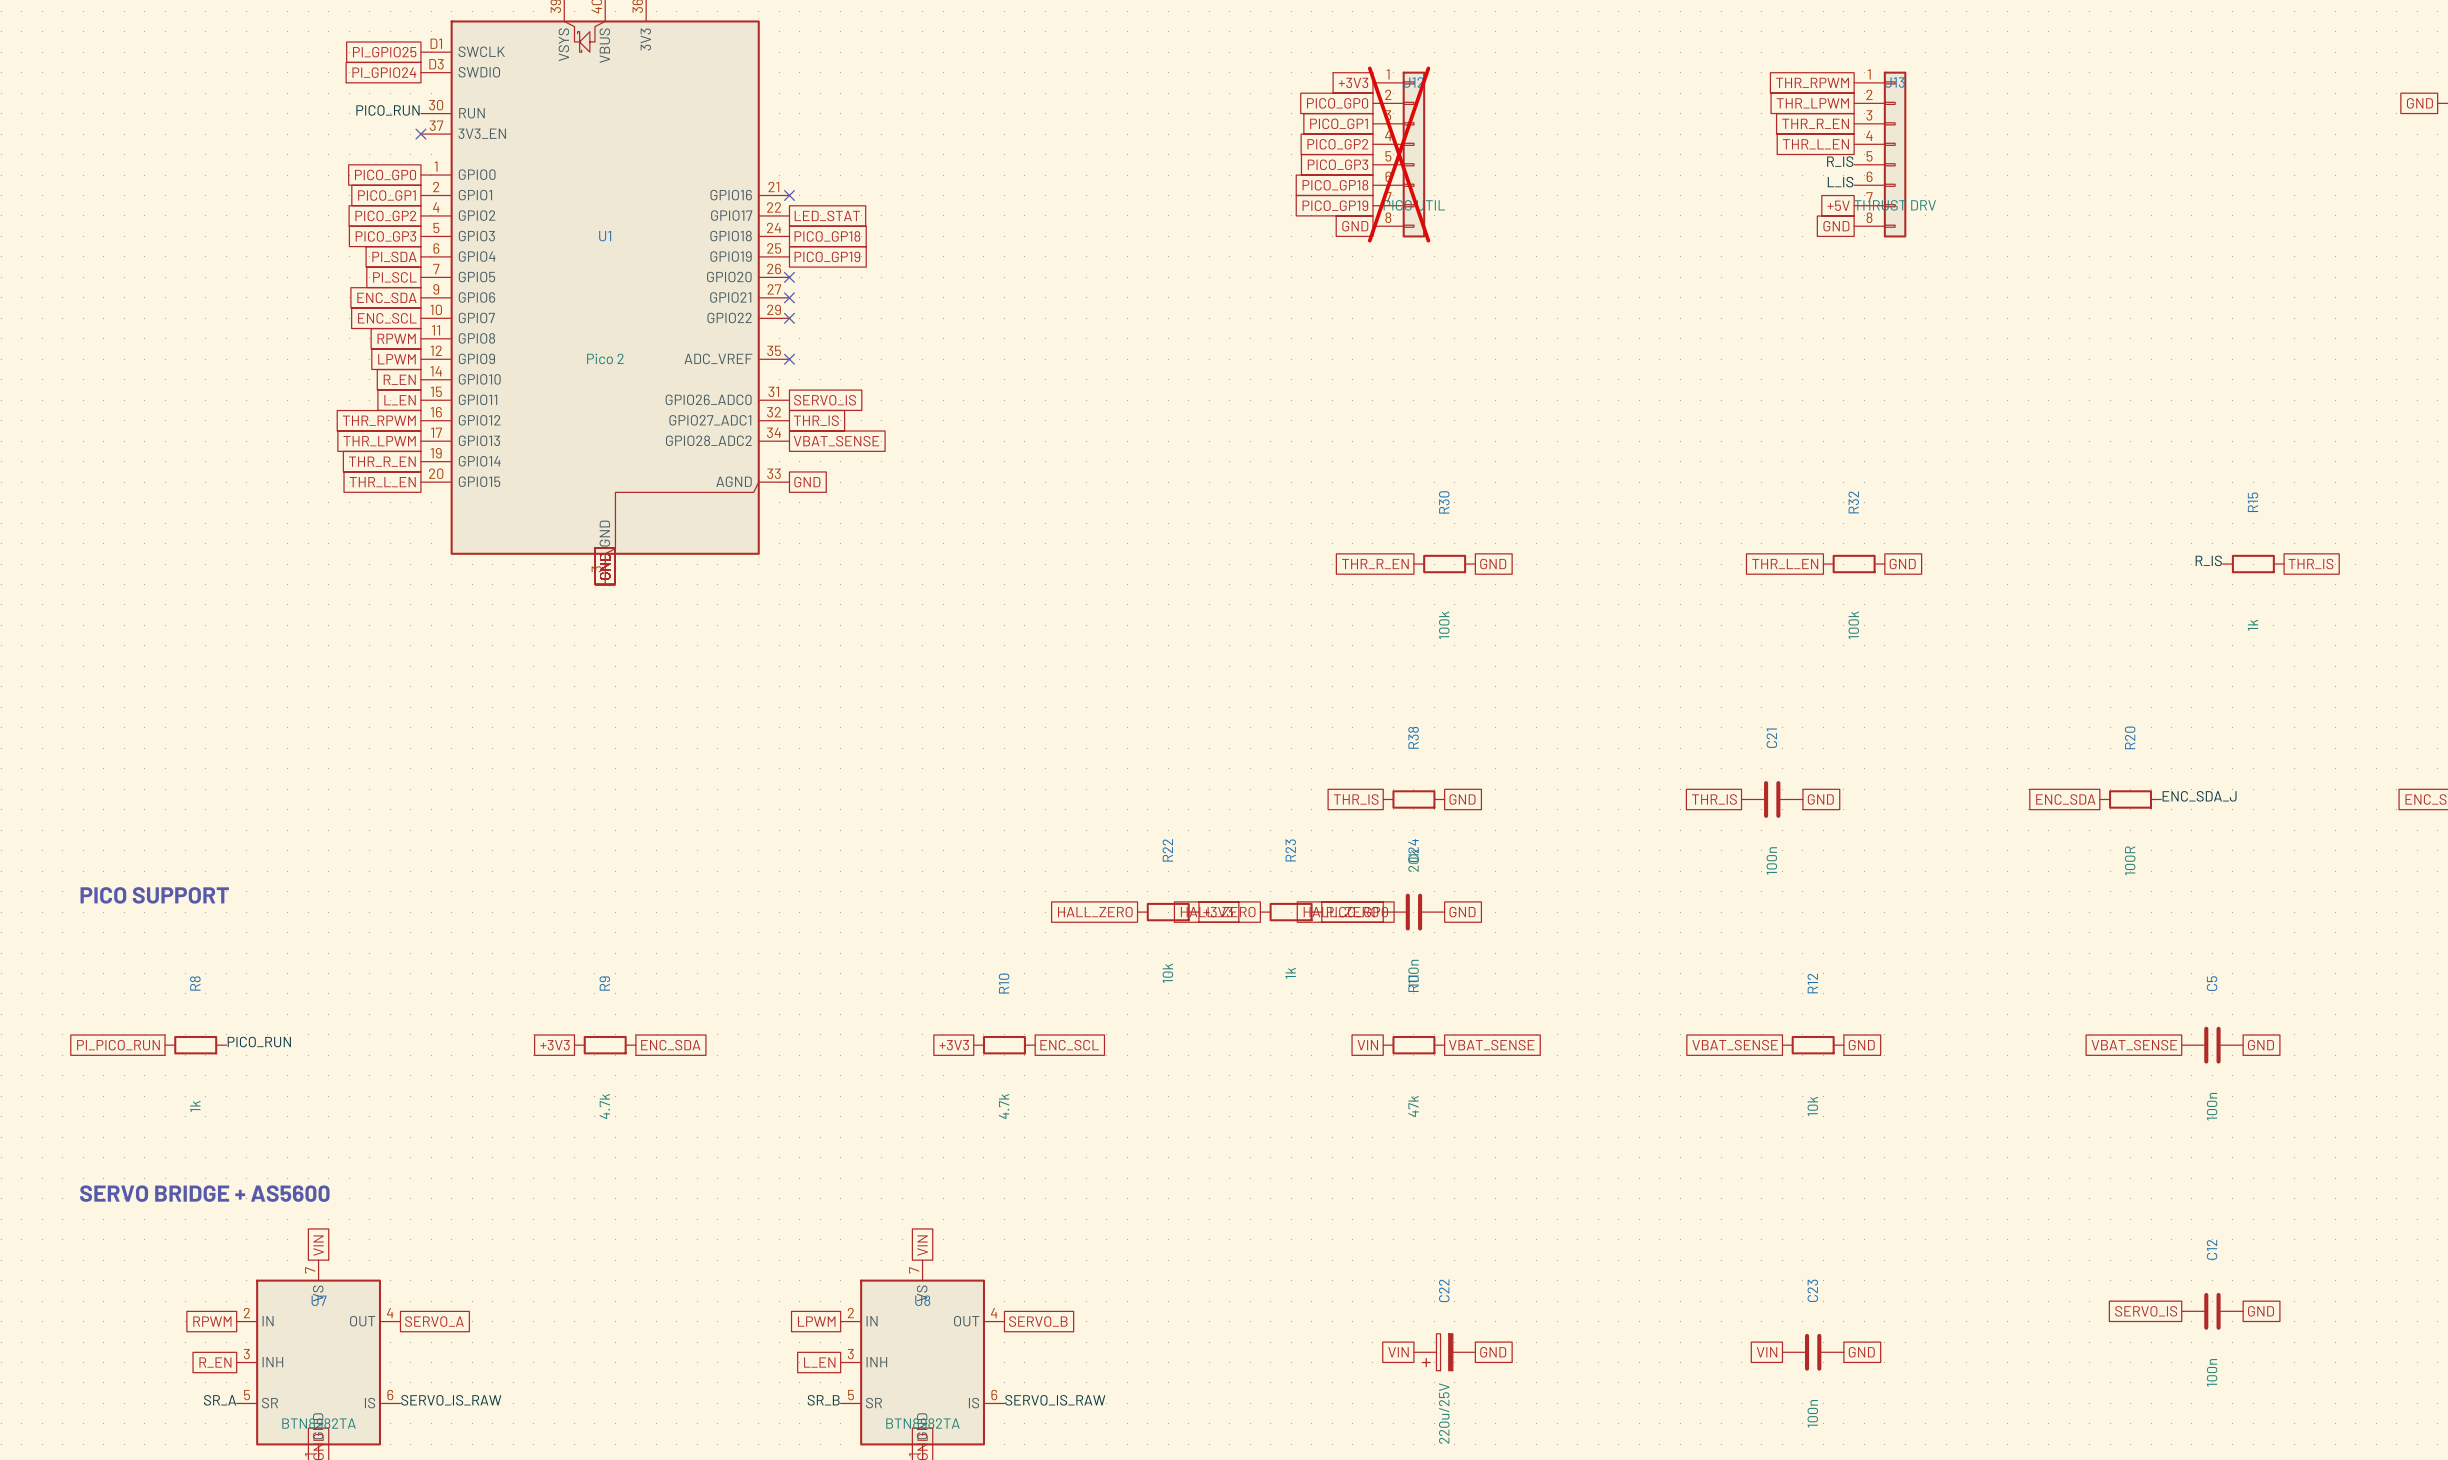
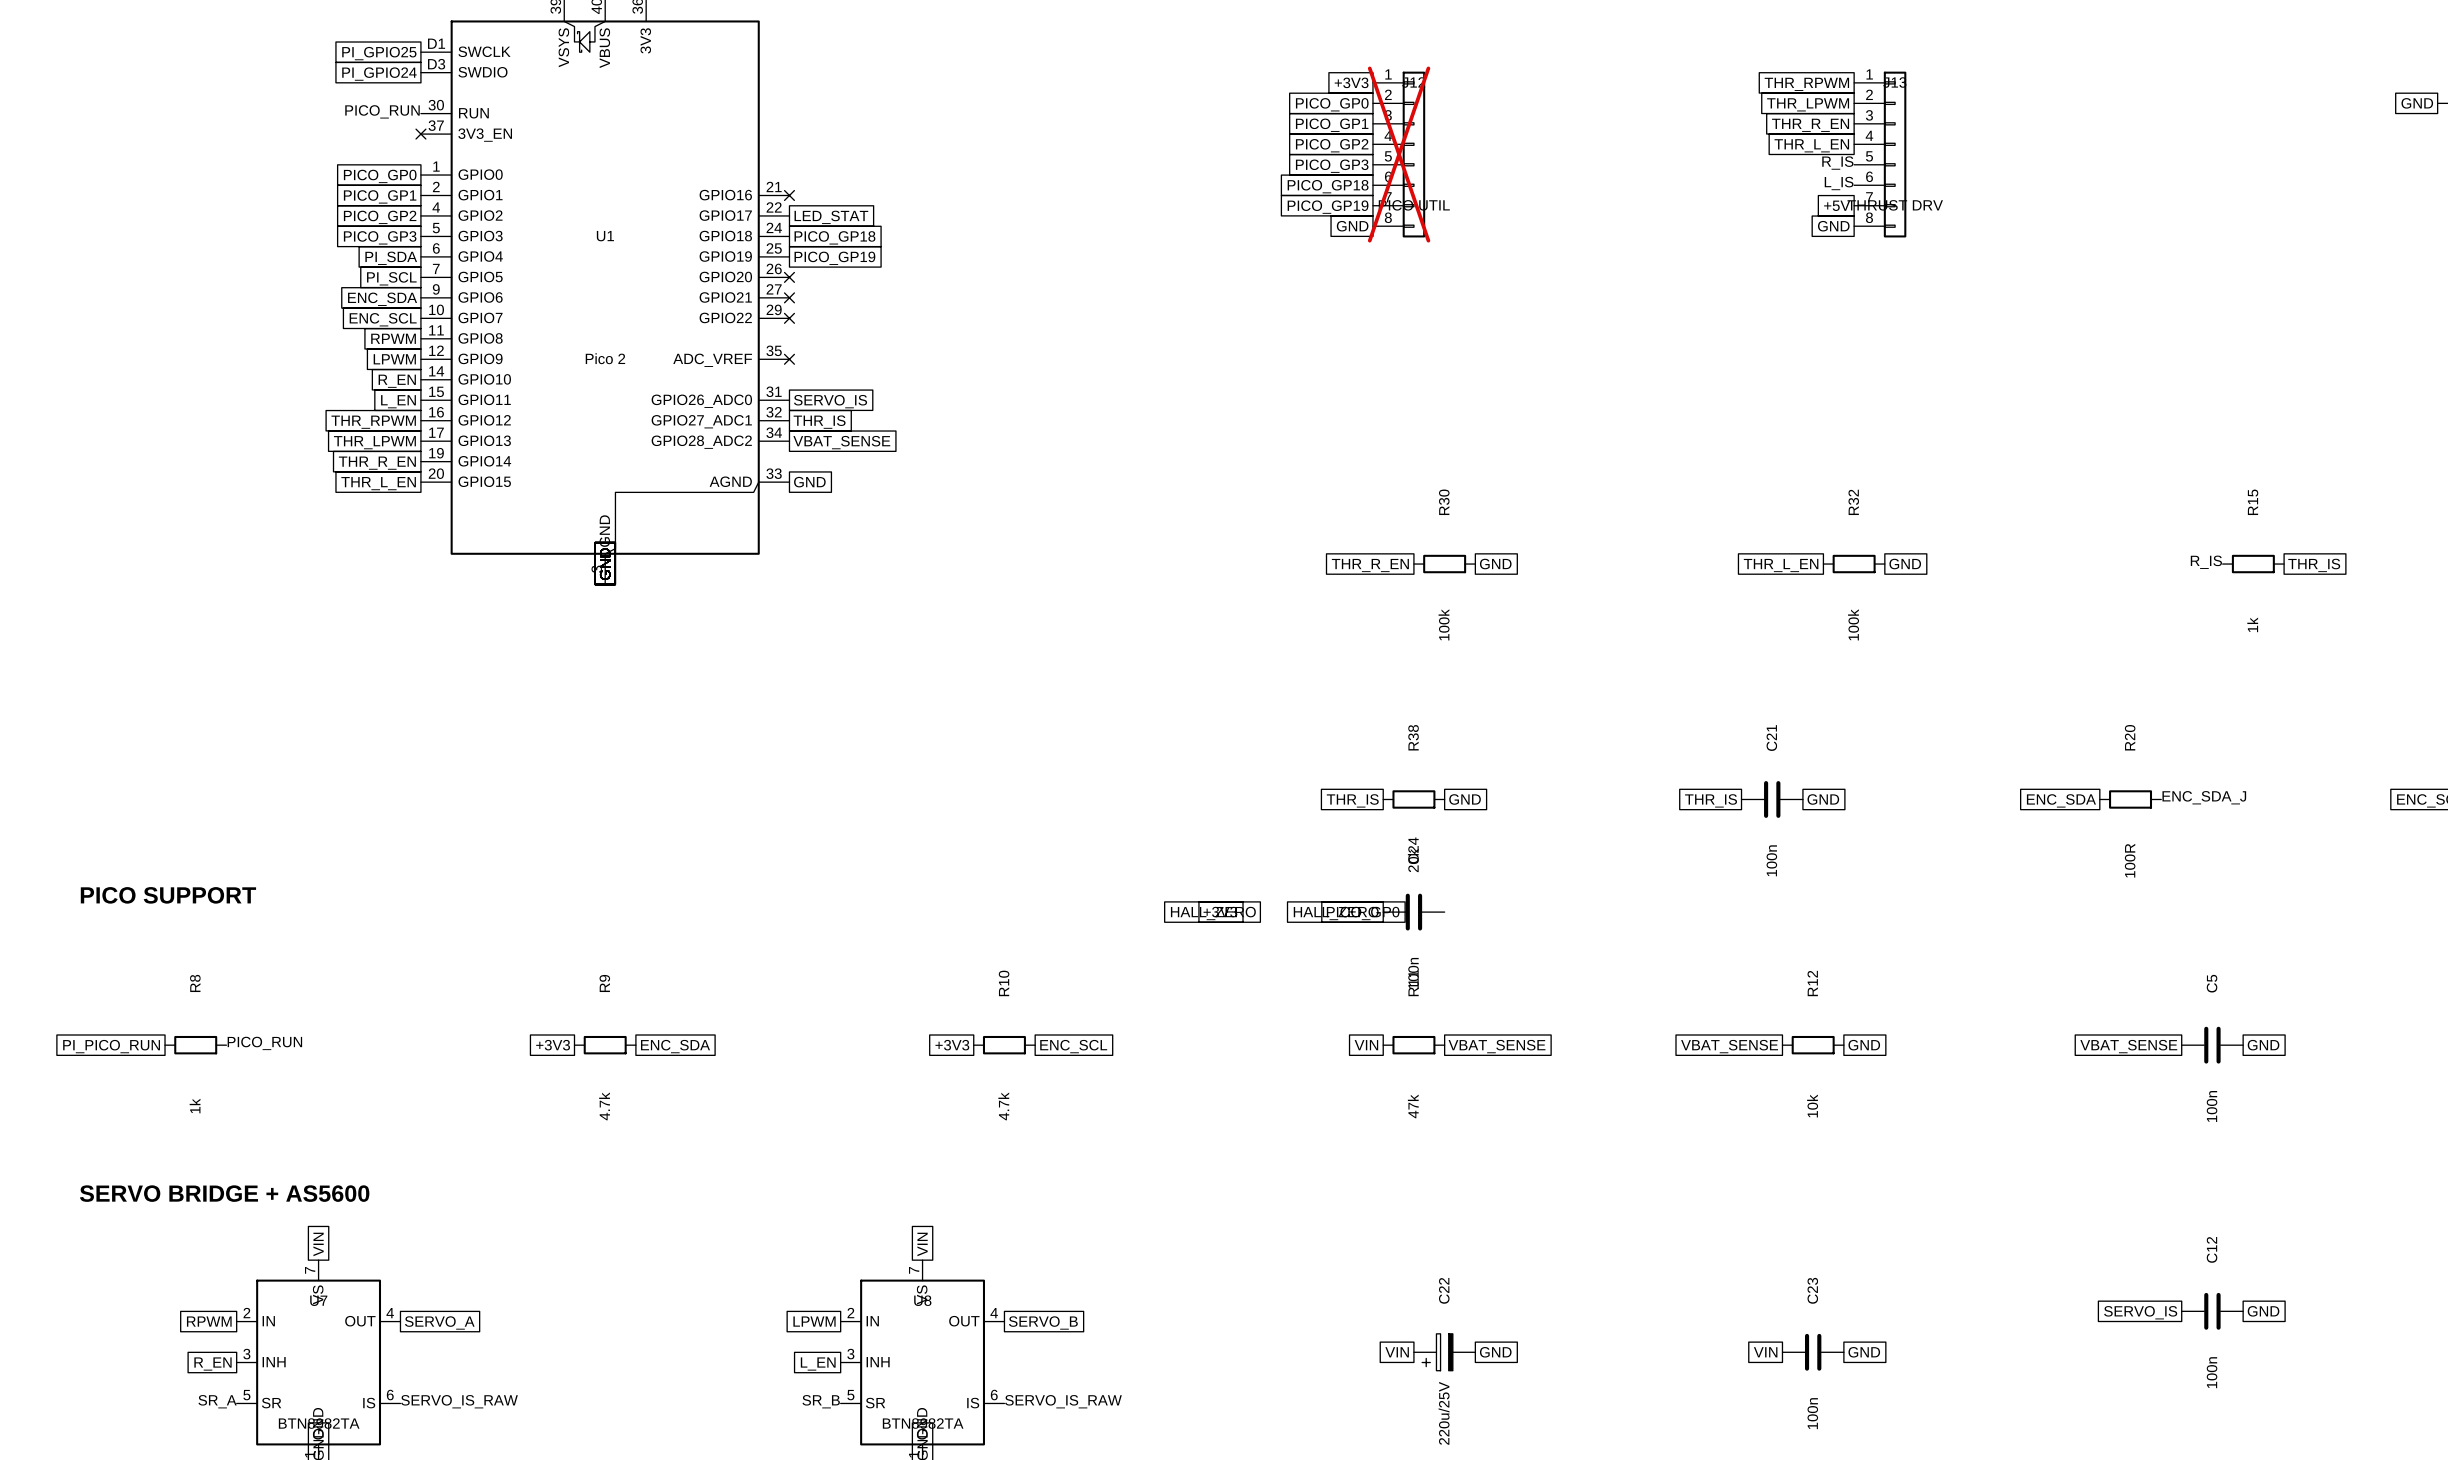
global label: HALL_ZERO (1095, 912) -> none
R22: 10k (1168, 912) -> none
R23: 1k (1291, 912) -> none
global label: GND (1462, 912) -> none

